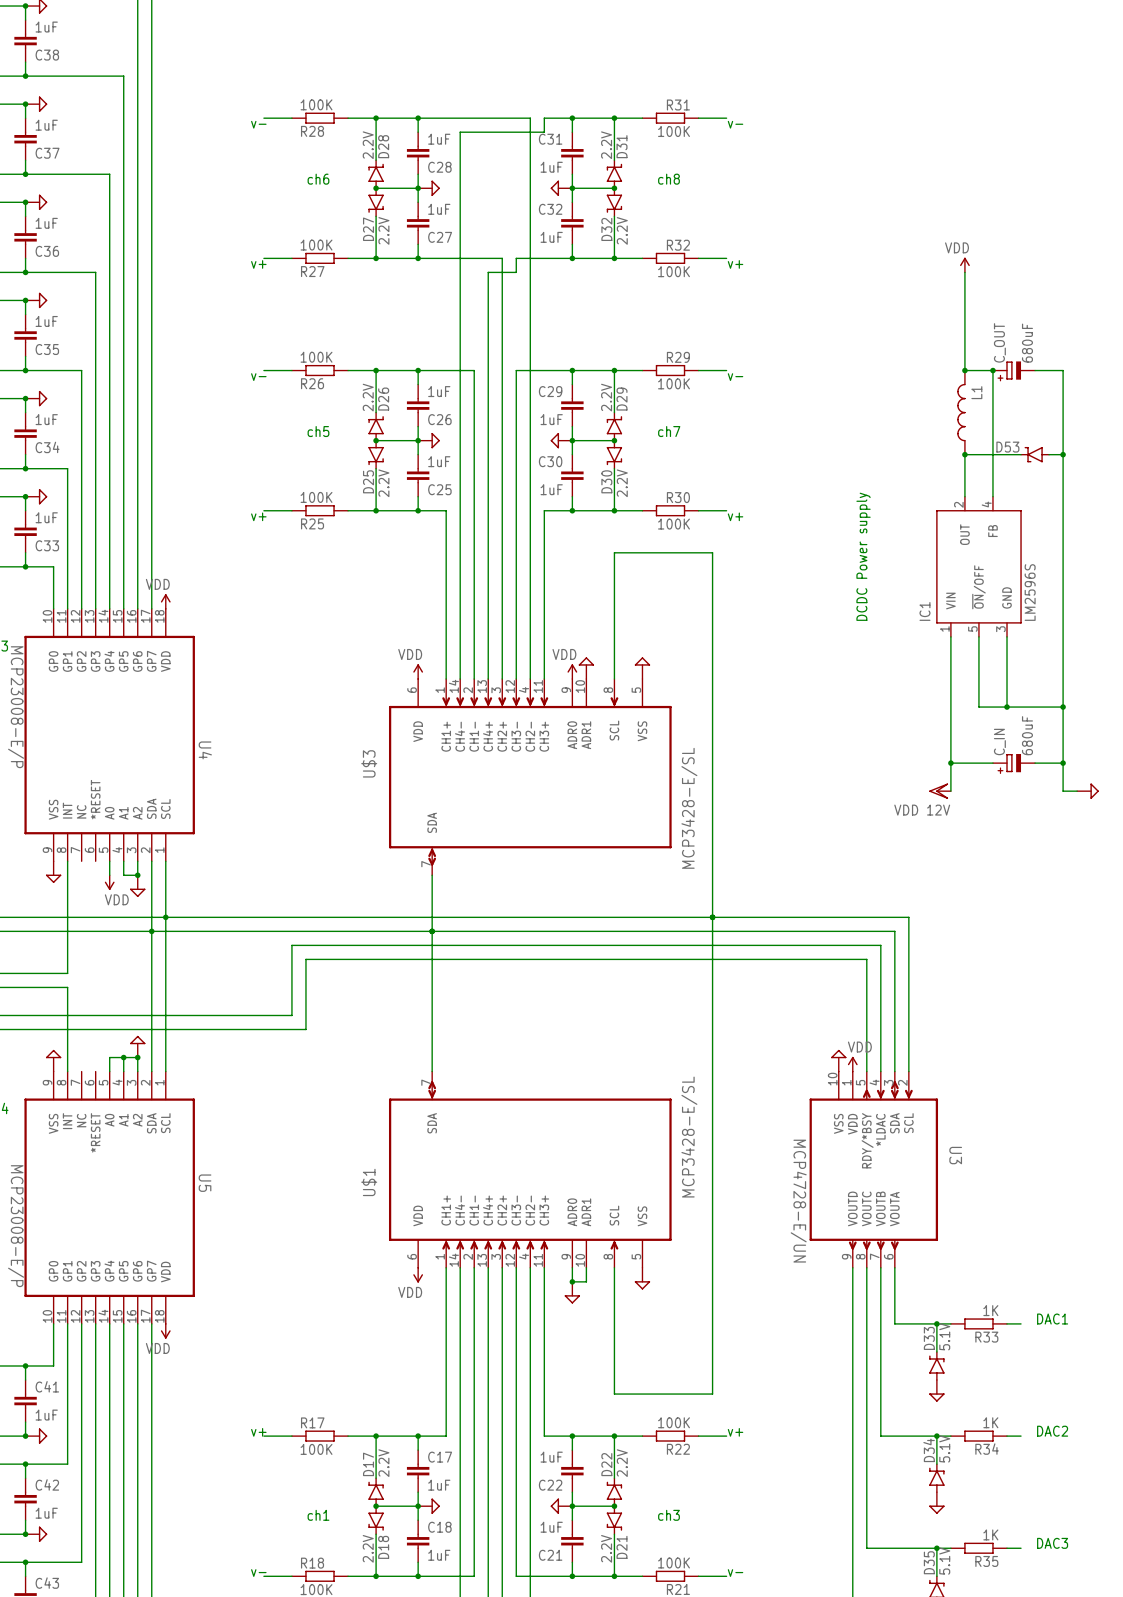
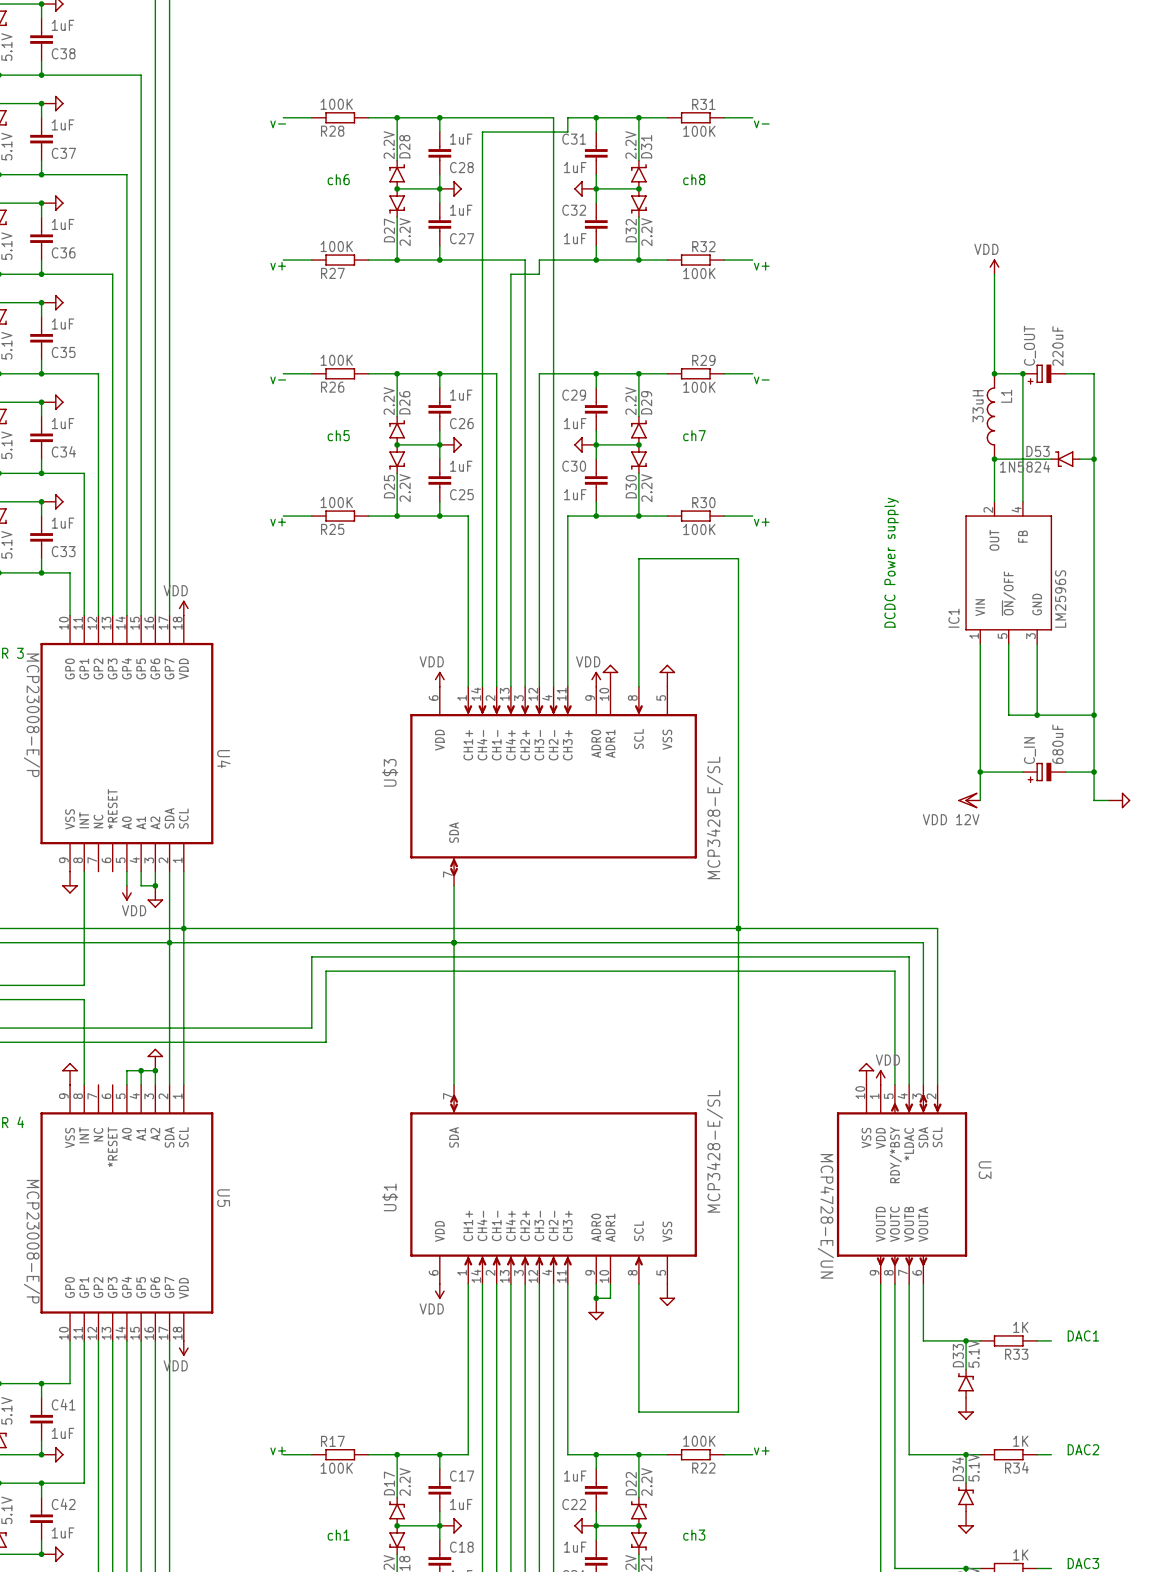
C_OUT value: 680uF (1027, 343) -> 220uF (1057, 346)
L1 value: none -> 33uH (978, 406)
D53 value: none -> 1N5824 (1025, 466)

